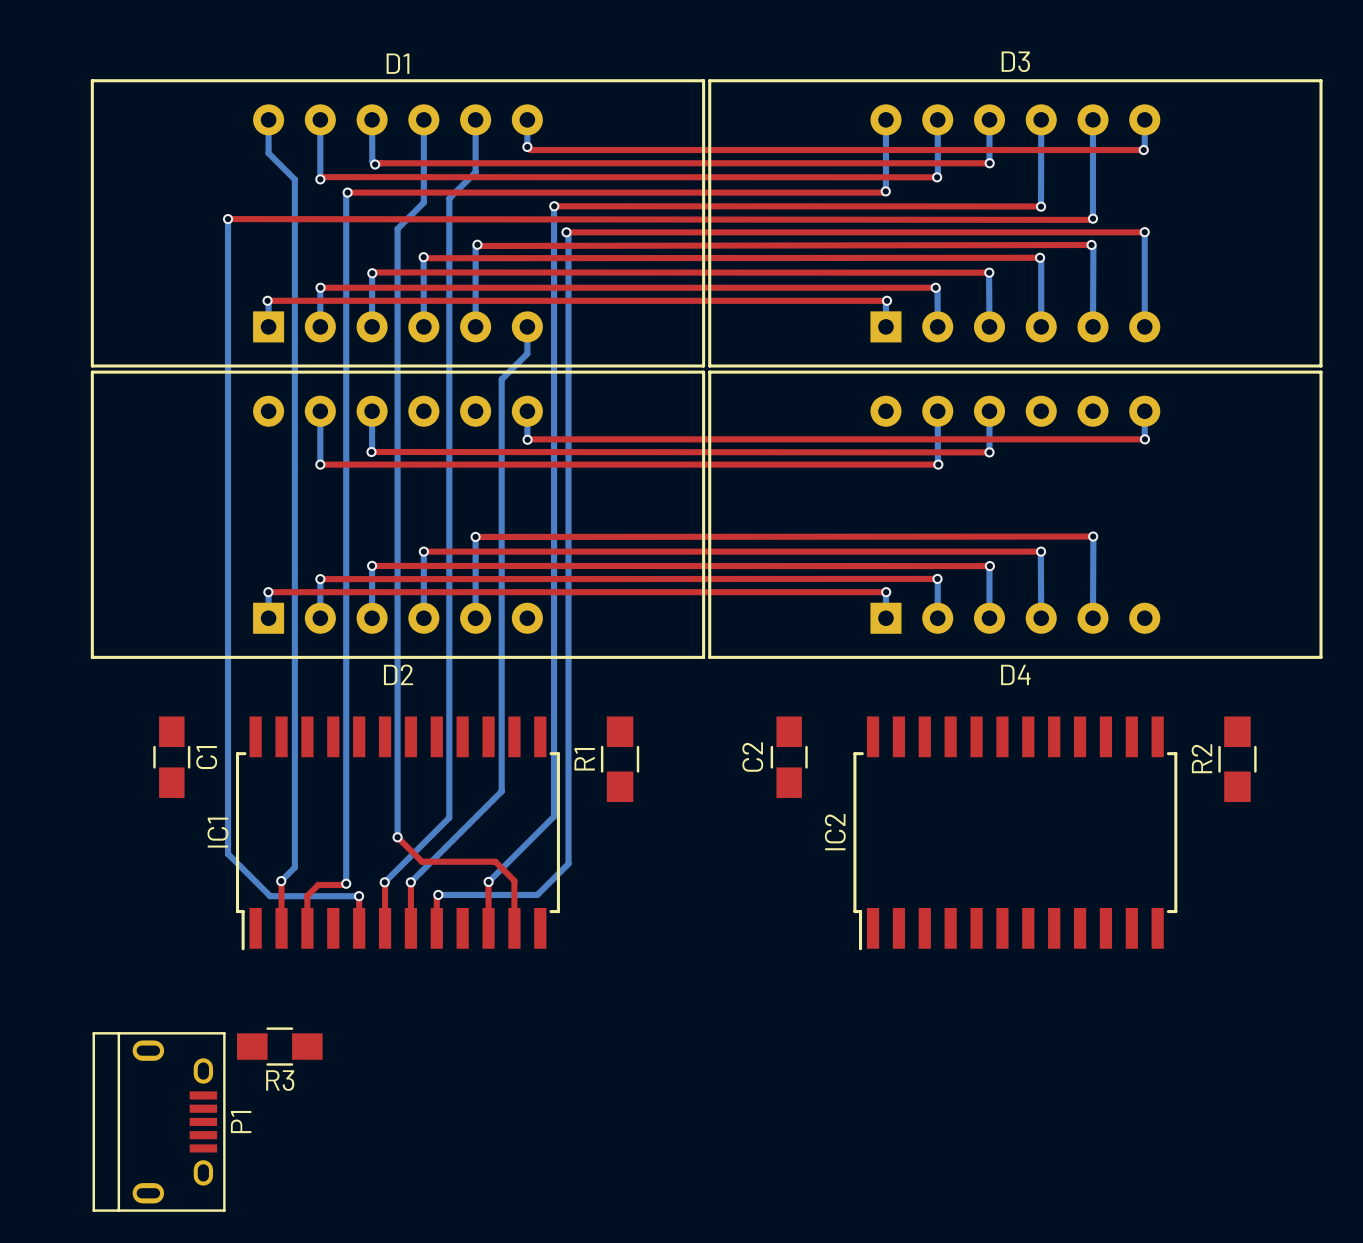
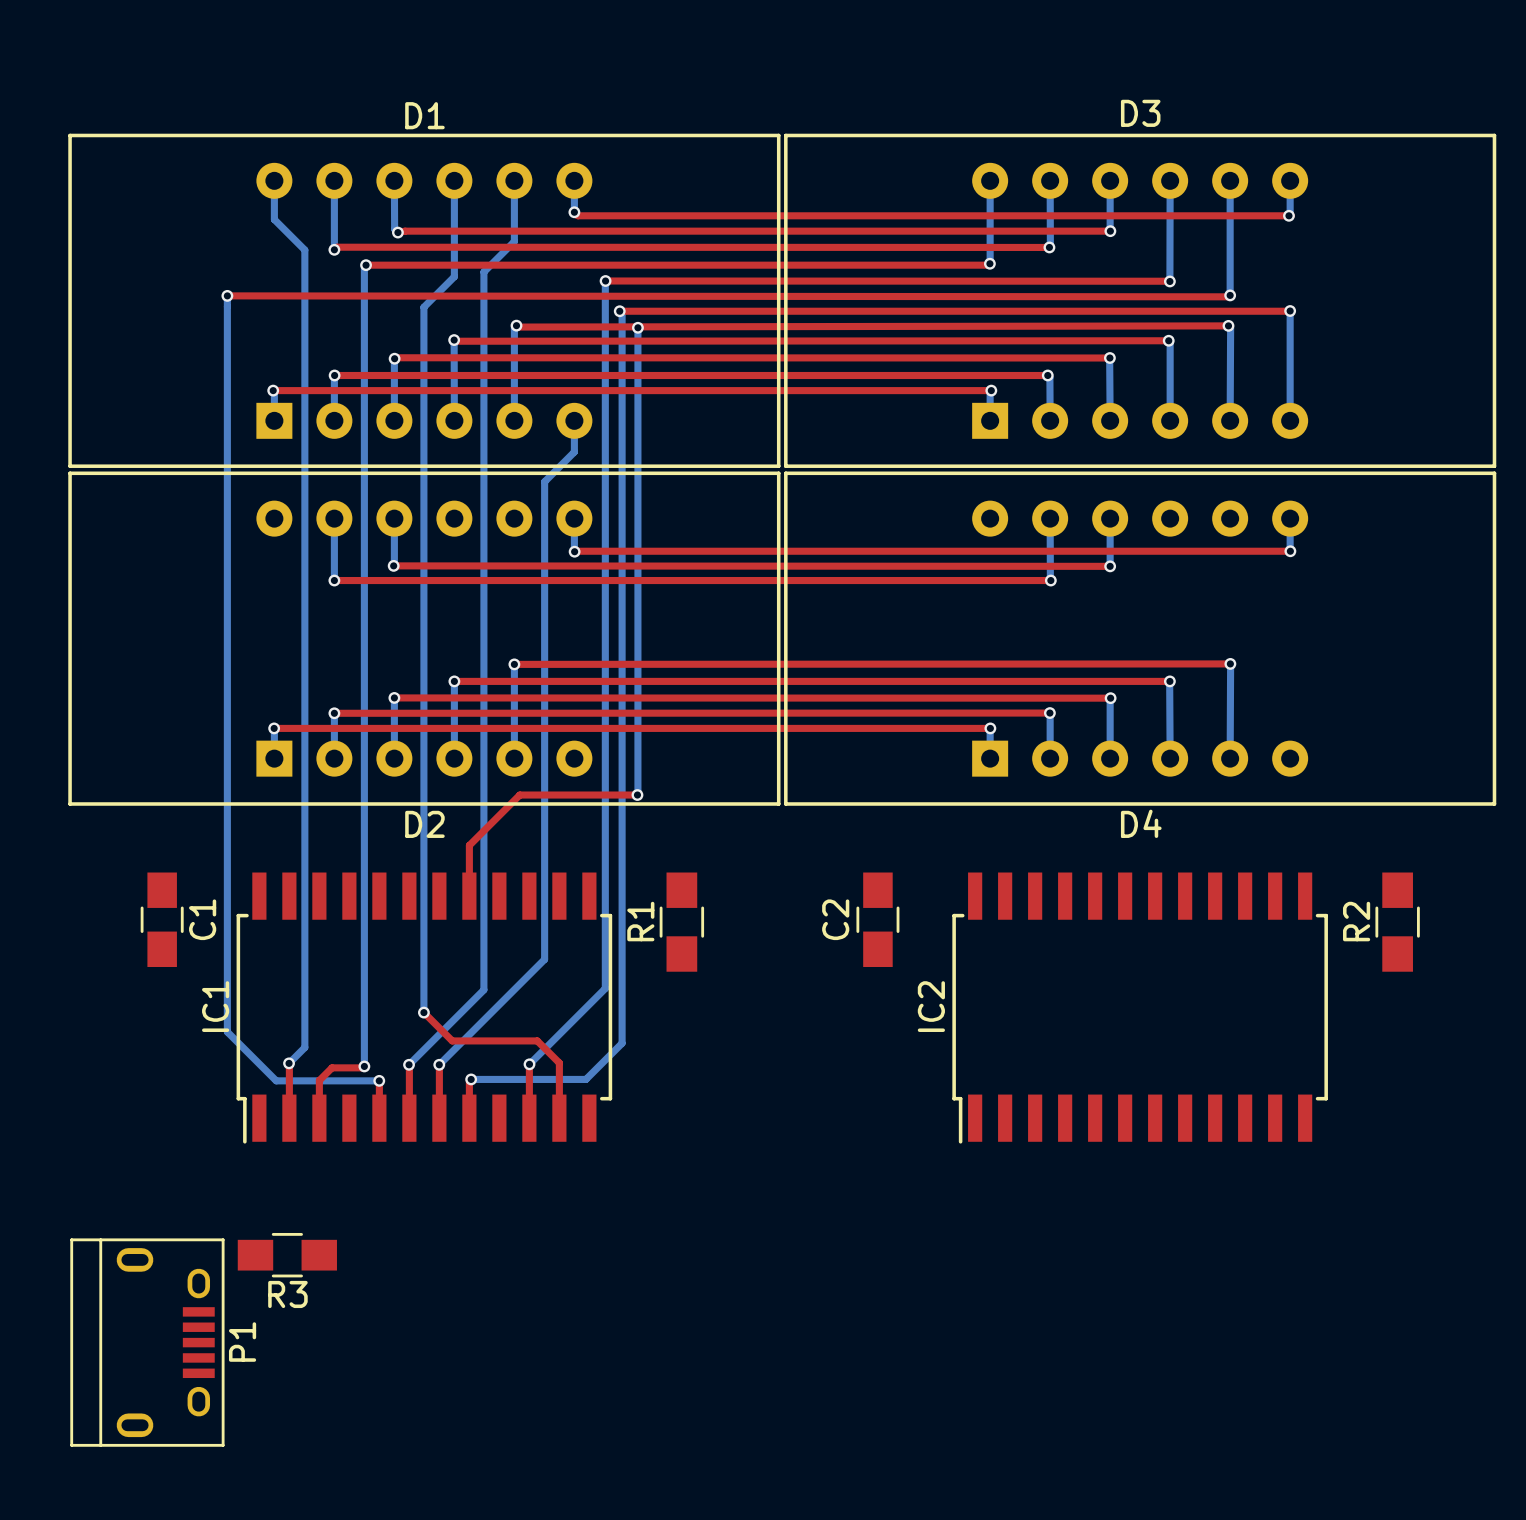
bottom track: none -> (637, 327) (637, 795)
via: none -> (637, 327)
top track: none -> (637, 795) (519, 795) (469, 845) (469, 896)
via: none -> (637, 795)

